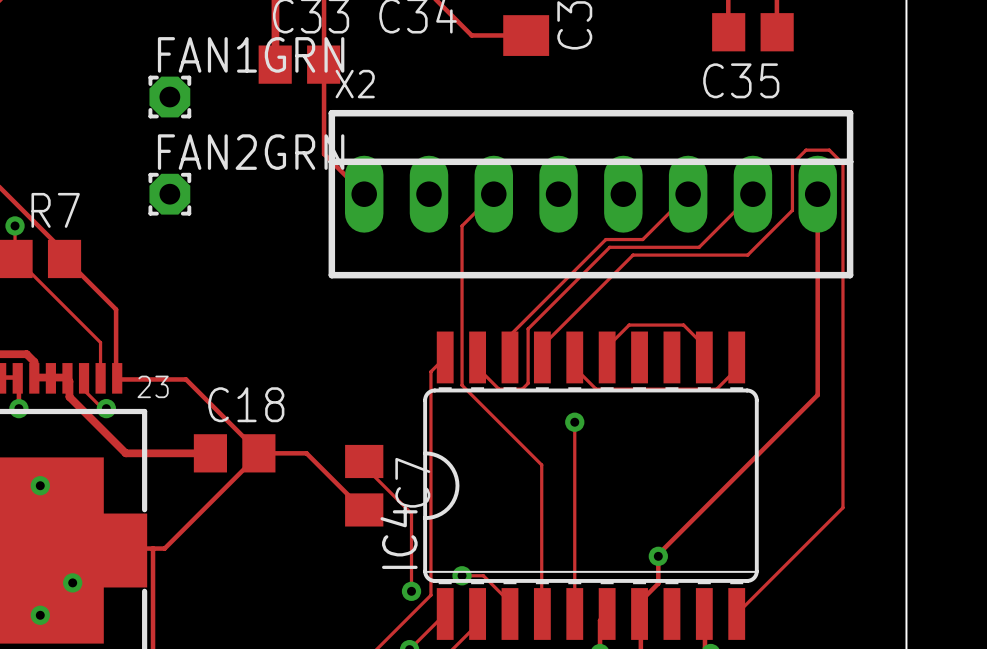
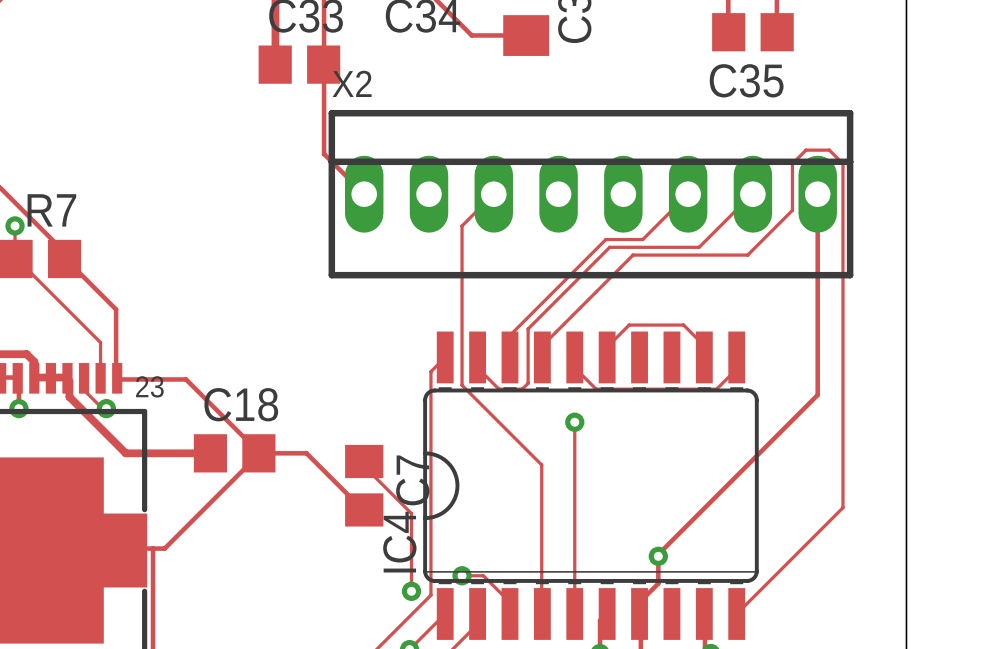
FAN1GRN: (169, 97) -> none
FAN2GRN: (169, 194) -> none
via: (40, 485) -> none
via: (72, 582) -> none
via: (40, 615) -> none

